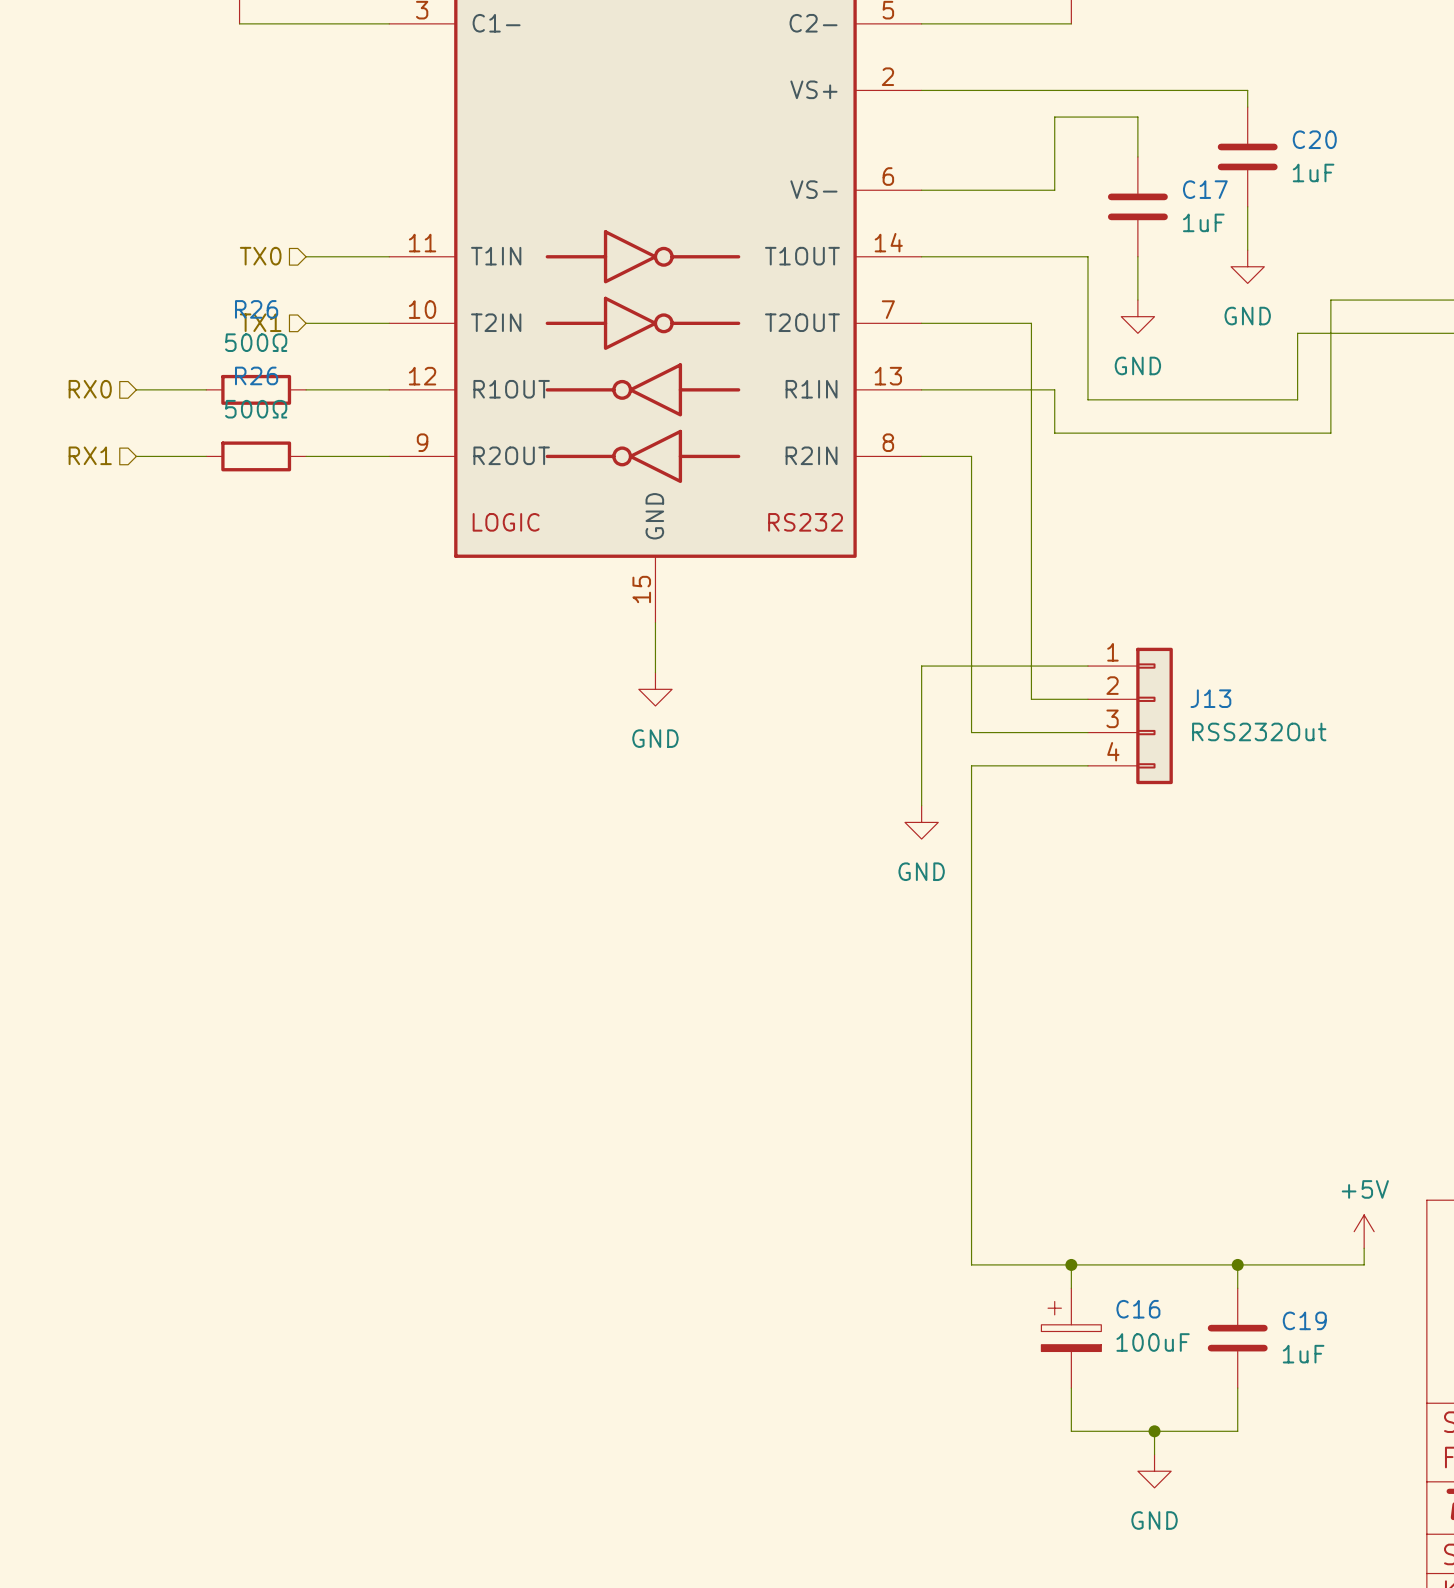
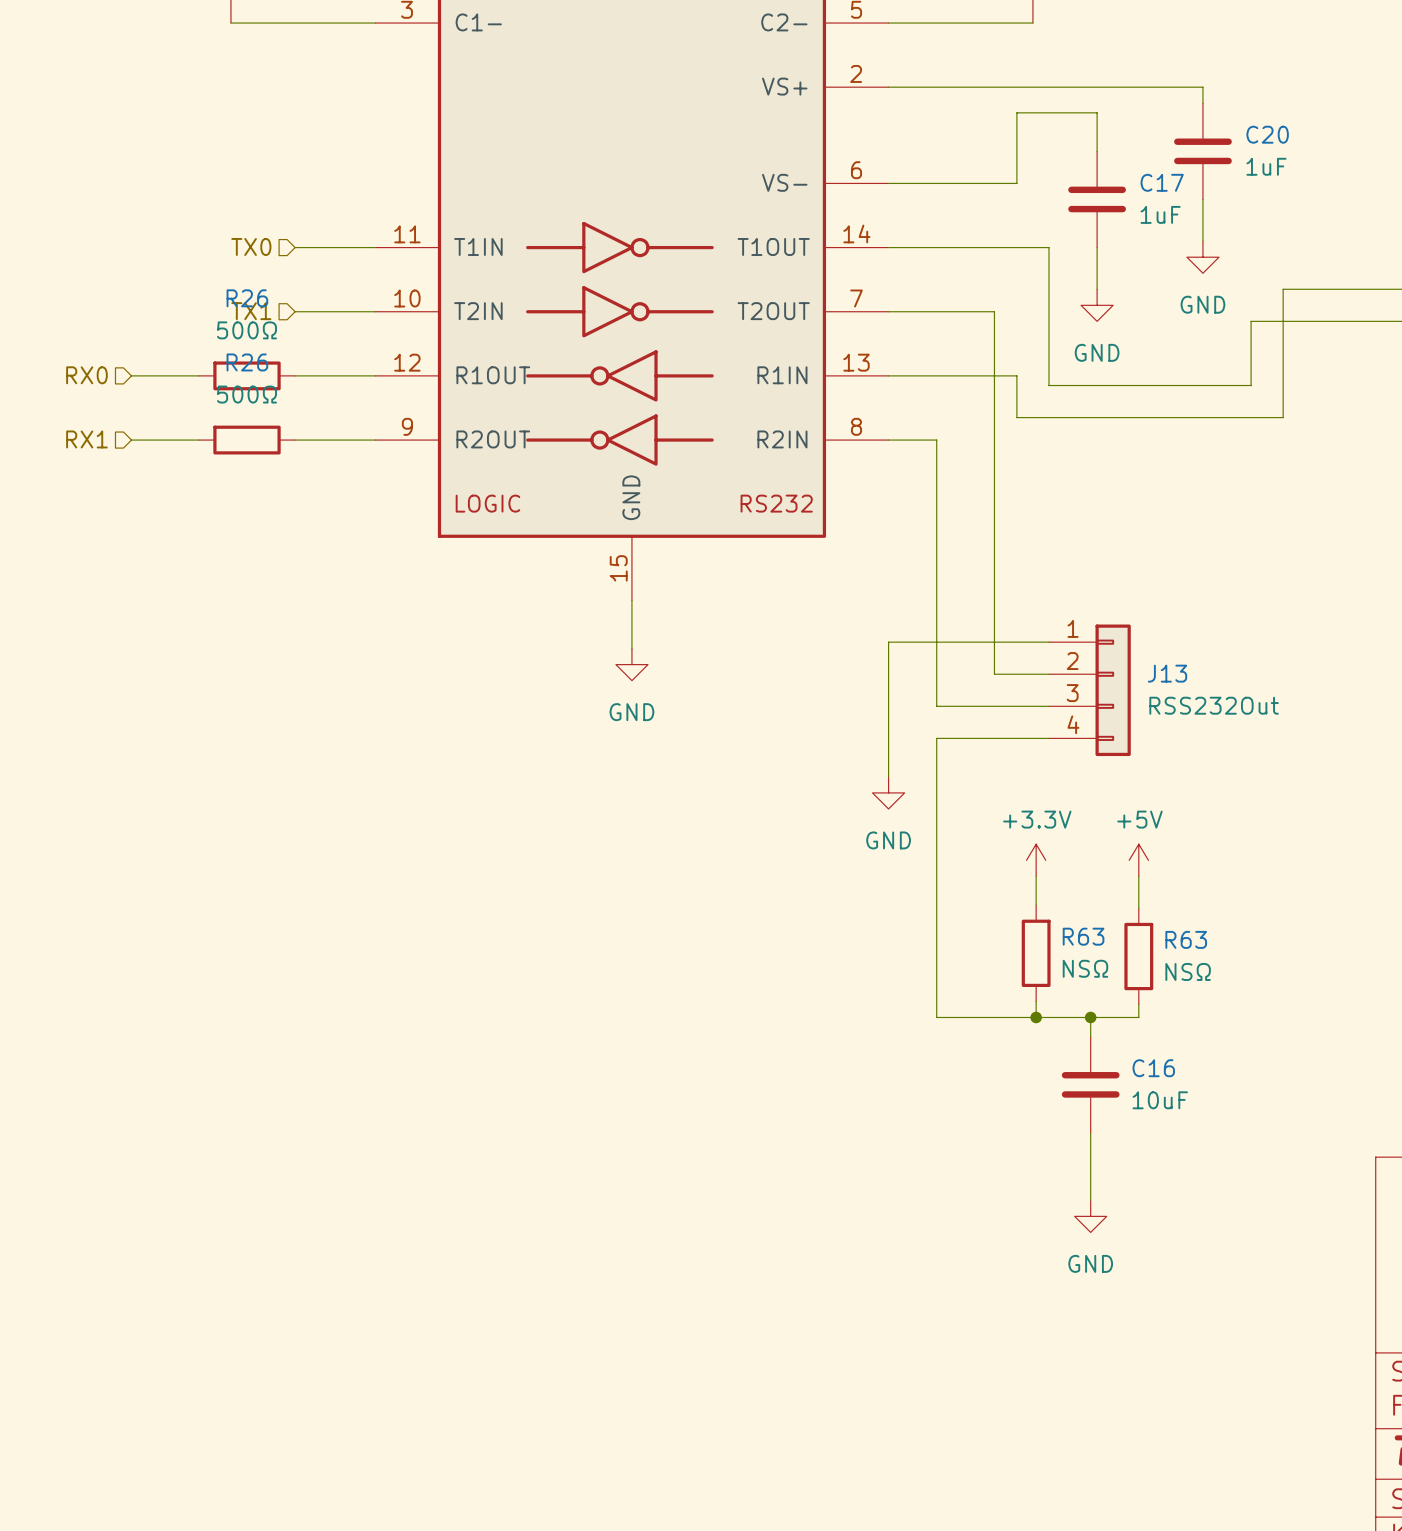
power symbol: none -> +3.3V (1036, 860)
power symbol: none -> +5V (1138, 860)
wire: none -> (1036, 876) (1036, 905)
wire: none -> (1138, 876) (1138, 908)
R63: none -> NSΩ (1036, 953)
R63: none -> NSΩ (1138, 956)
wire: none -> (1036, 1001) (1036, 1017)
wire: (971, 1055) (971, 1264) (1364, 1264) (1364, 1248) -> (936, 1017) (1138, 1017) (1138, 1004)
junction: none -> (1036, 1017)
wire: none -> (1090, 1017) (1090, 1036)
junction: none -> (1090, 1017)
wire: none -> (1090, 1132) (1090, 1200)
power symbol: +5V (1364, 1231) -> none
wire: (1071, 1264) (1071, 1288) -> none
junction: (1071, 1264) -> none
wire: (1237, 1264) (1237, 1288) -> none
junction: (1237, 1264) -> none
C16 symbol: [1041, 1288, 1102, 1389] -> [1061, 1036, 1120, 1133]
C19: 1uF (1237, 1338) -> none
C16 value: 100uF (1153, 1342) -> 10uF (1160, 1100)
wire: (1071, 1388) (1071, 1431) (1237, 1431) (1237, 1388) -> none
wire: (1154, 1431) (1154, 1454) -> none
junction: (1154, 1431) -> none
power symbol position: GND (1154, 1471) -> GND (1090, 1216)

